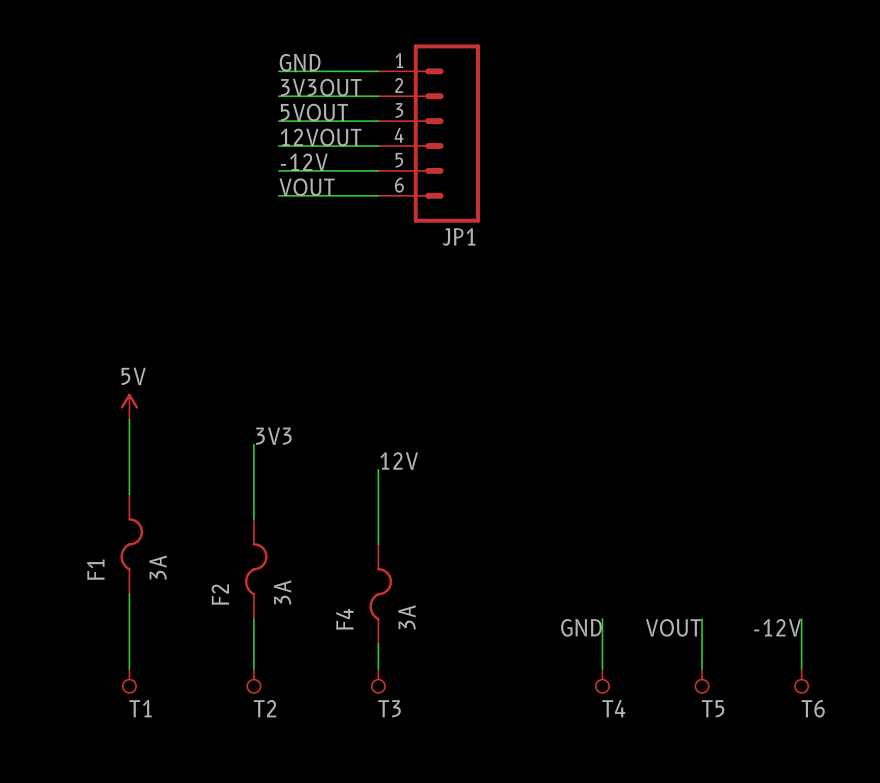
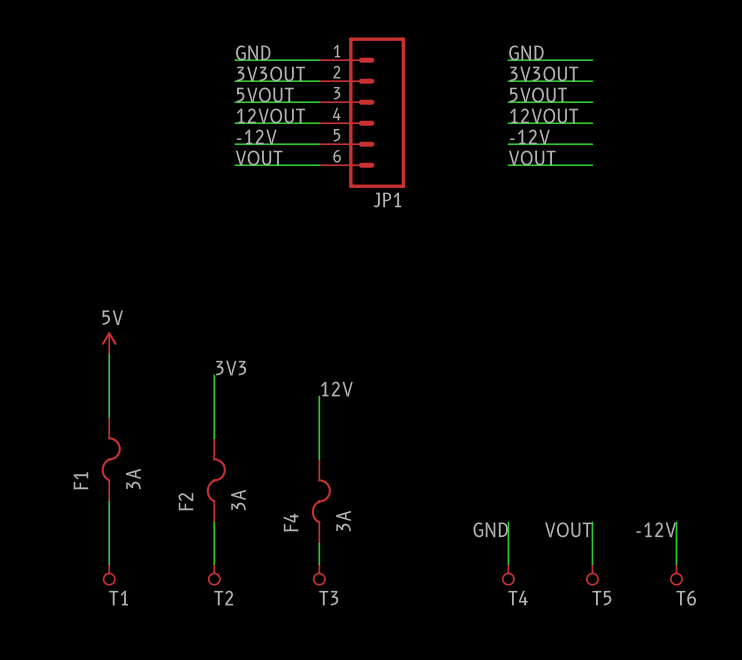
label: none -> GND (526, 52)
wire: none -> (508, 60) (592, 60)
label: none -> 3V3OUT (544, 73)
wire: none -> (508, 81) (592, 81)
label: none -> 5VOUT (538, 94)
wire: none -> (508, 102) (592, 102)
label: none -> 12VOUT (544, 115)
wire: none -> (508, 123) (592, 123)
label: none -> -12V (529, 136)
wire: none -> (508, 144) (592, 144)
label: none -> VOUT (532, 157)
wire: none -> (508, 165) (592, 165)

